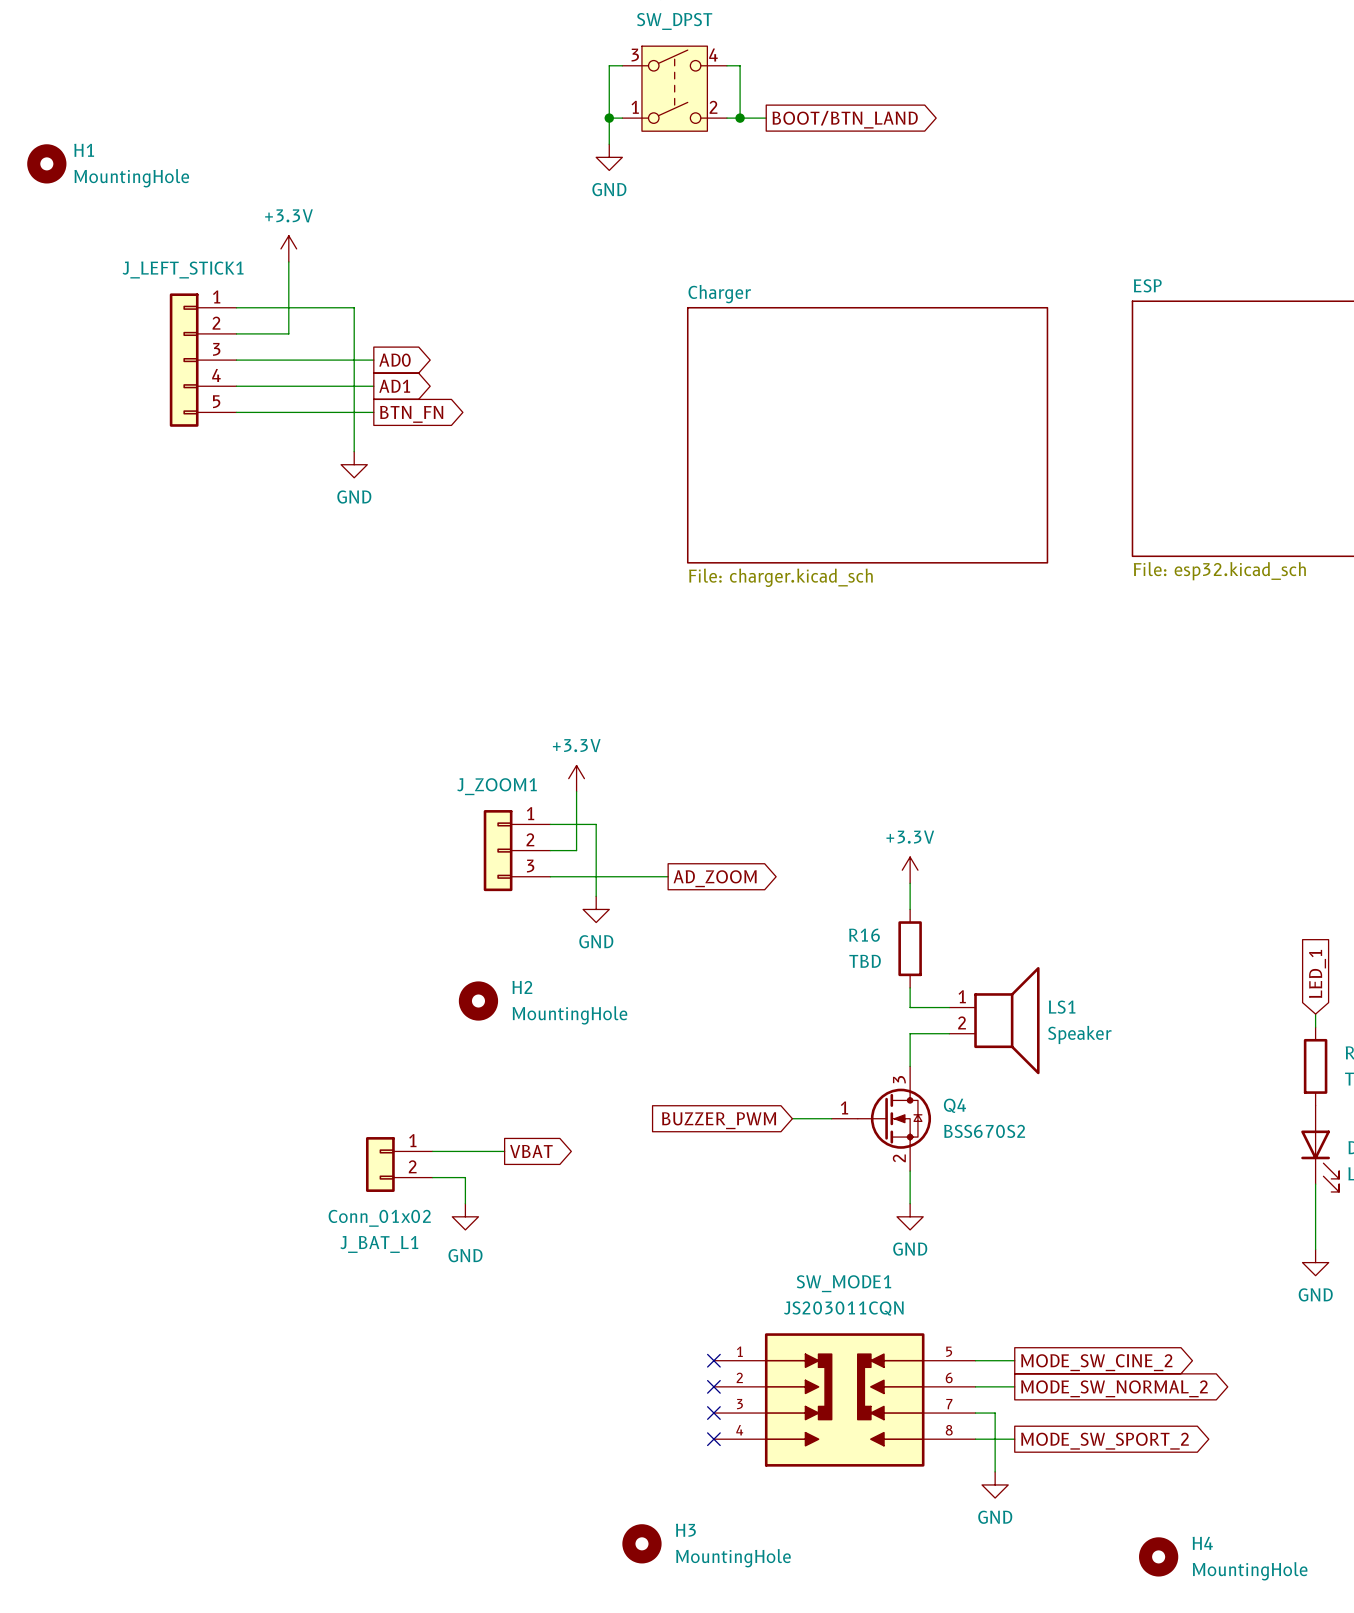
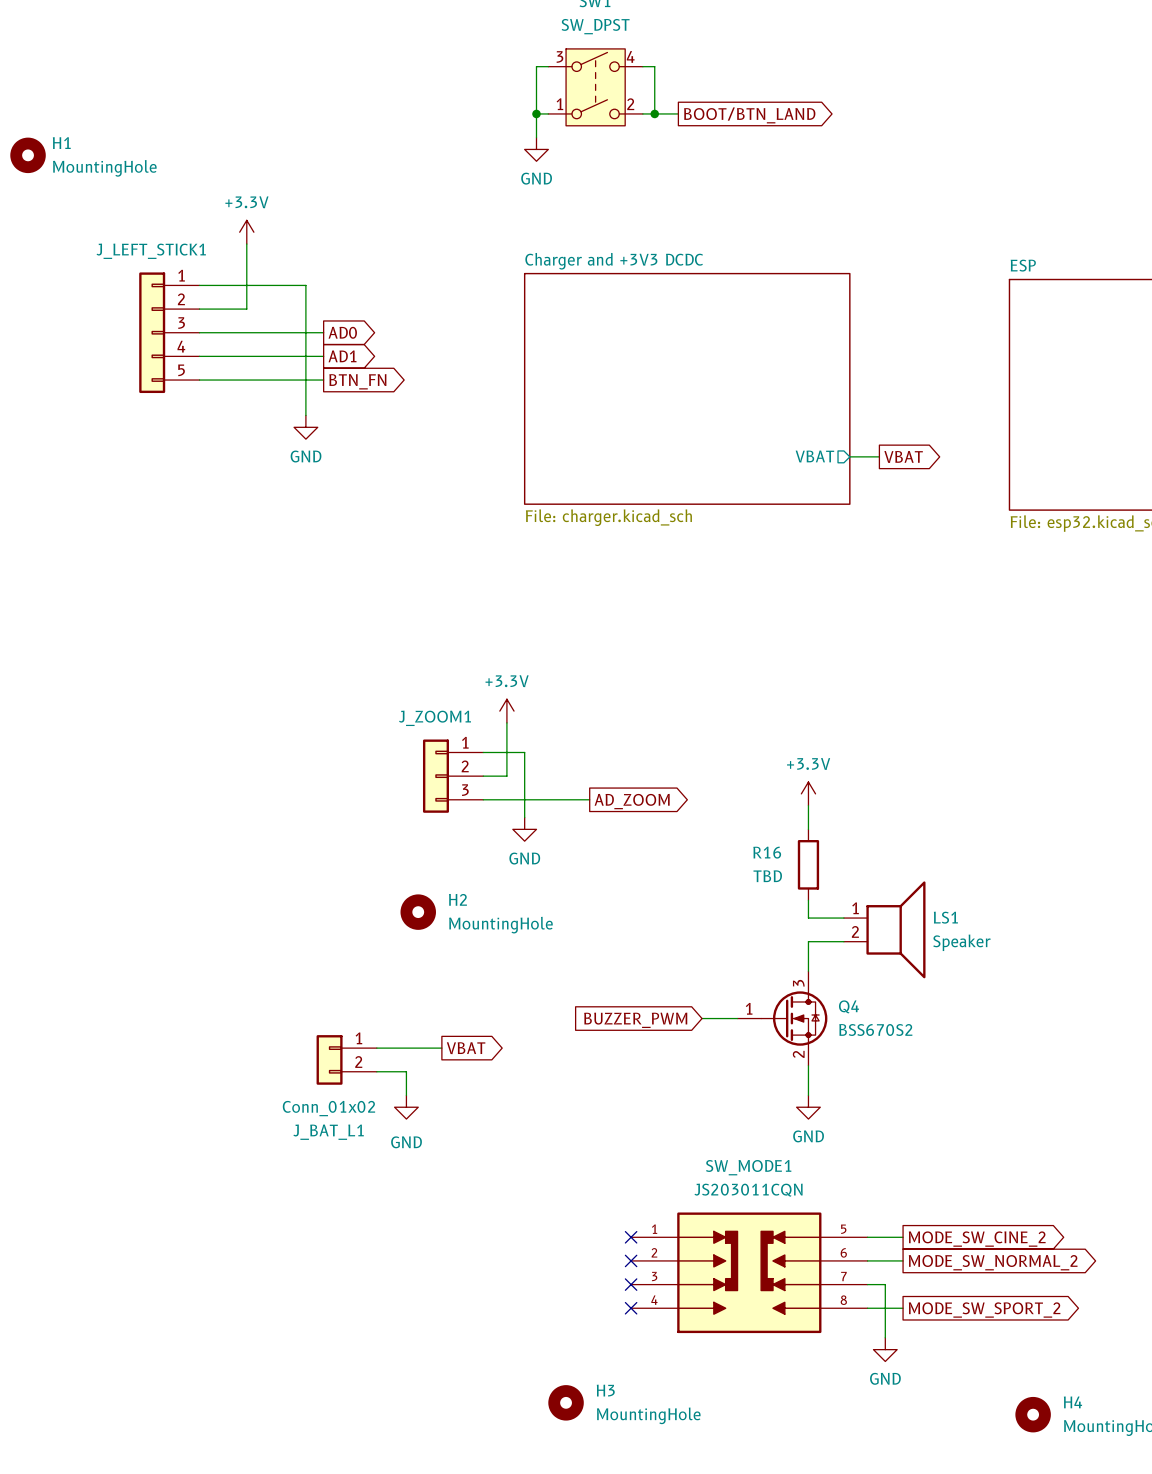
sheet Charger and +3V3 DCDC: none -> File: charger.kicad_sch (687, 388)
sheet Charger: File: charger.kicad_sch (867, 435) -> none
sheet pin: none -> VBAT (814, 456)
wire: none -> (849, 456) (879, 456)
global label: none -> VBAT (903, 456)

